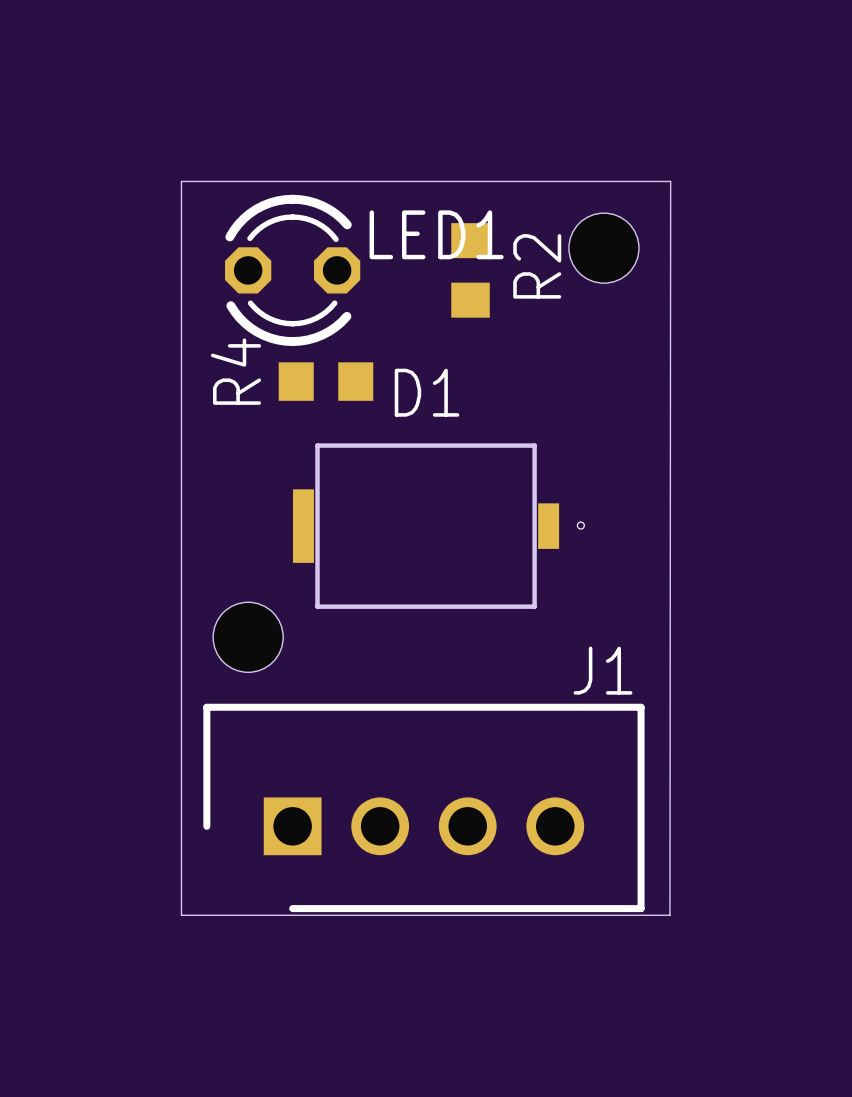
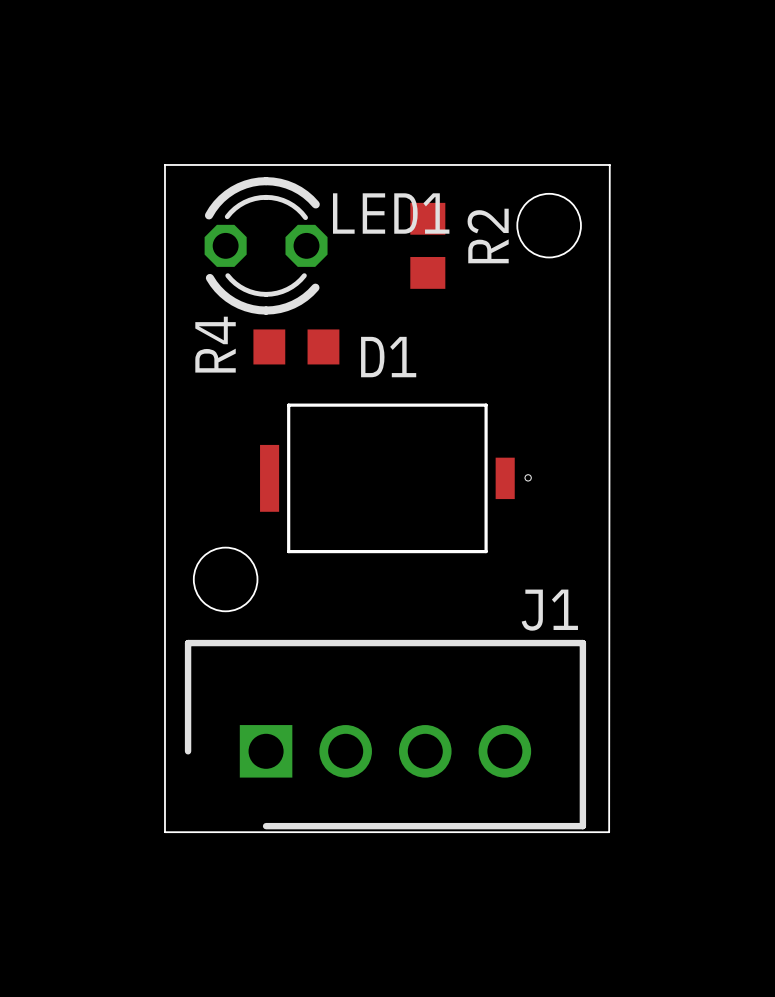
D1 footprint: [292, 443, 585, 609] -> [260, 403, 532, 554]

